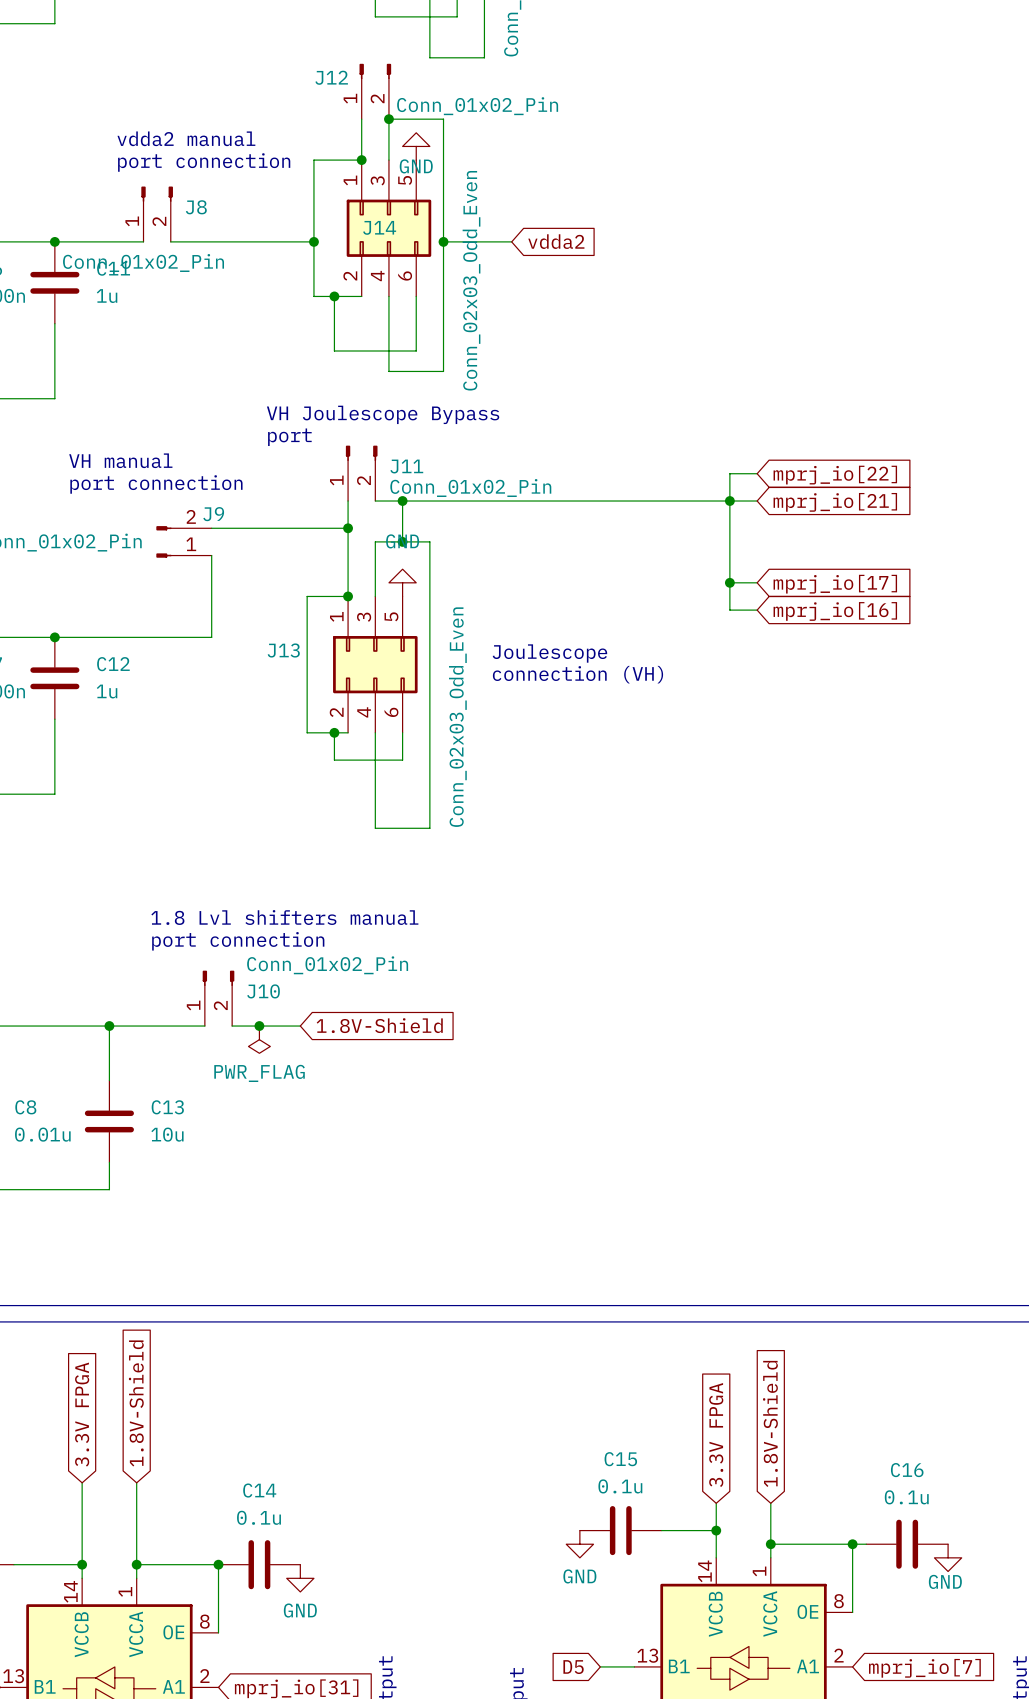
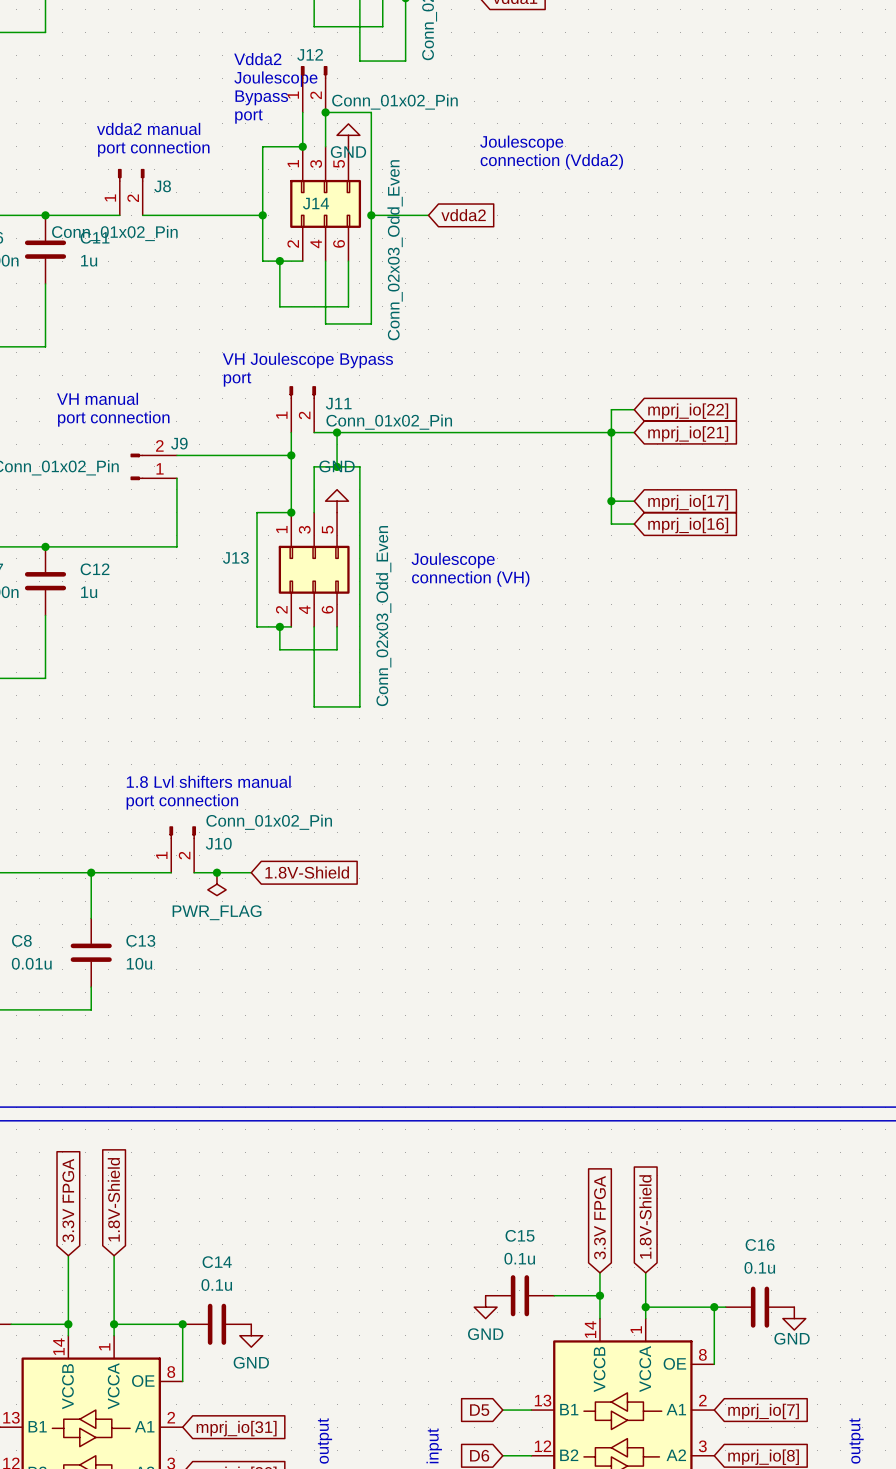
text: none -> Vdda2 (257, 59)
J12 name position: J12 (331, 77) -> J12 (310, 54)
text: none -> Joulescope (275, 79)
text: none -> Bypass (261, 97)
text: none -> port (248, 116)
text: none -> Joulescope (521, 143)
text: none -> connection (Vdda2) (551, 161)

